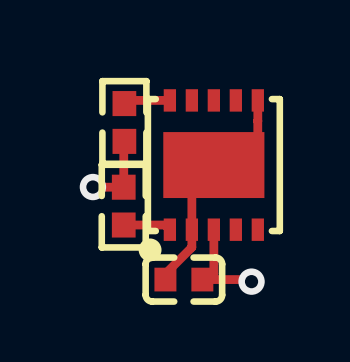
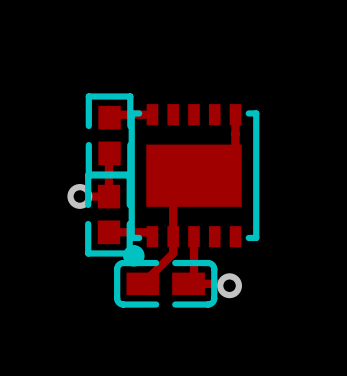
part footprint: [142, 254, 226, 305] -> [114, 259, 218, 308]

